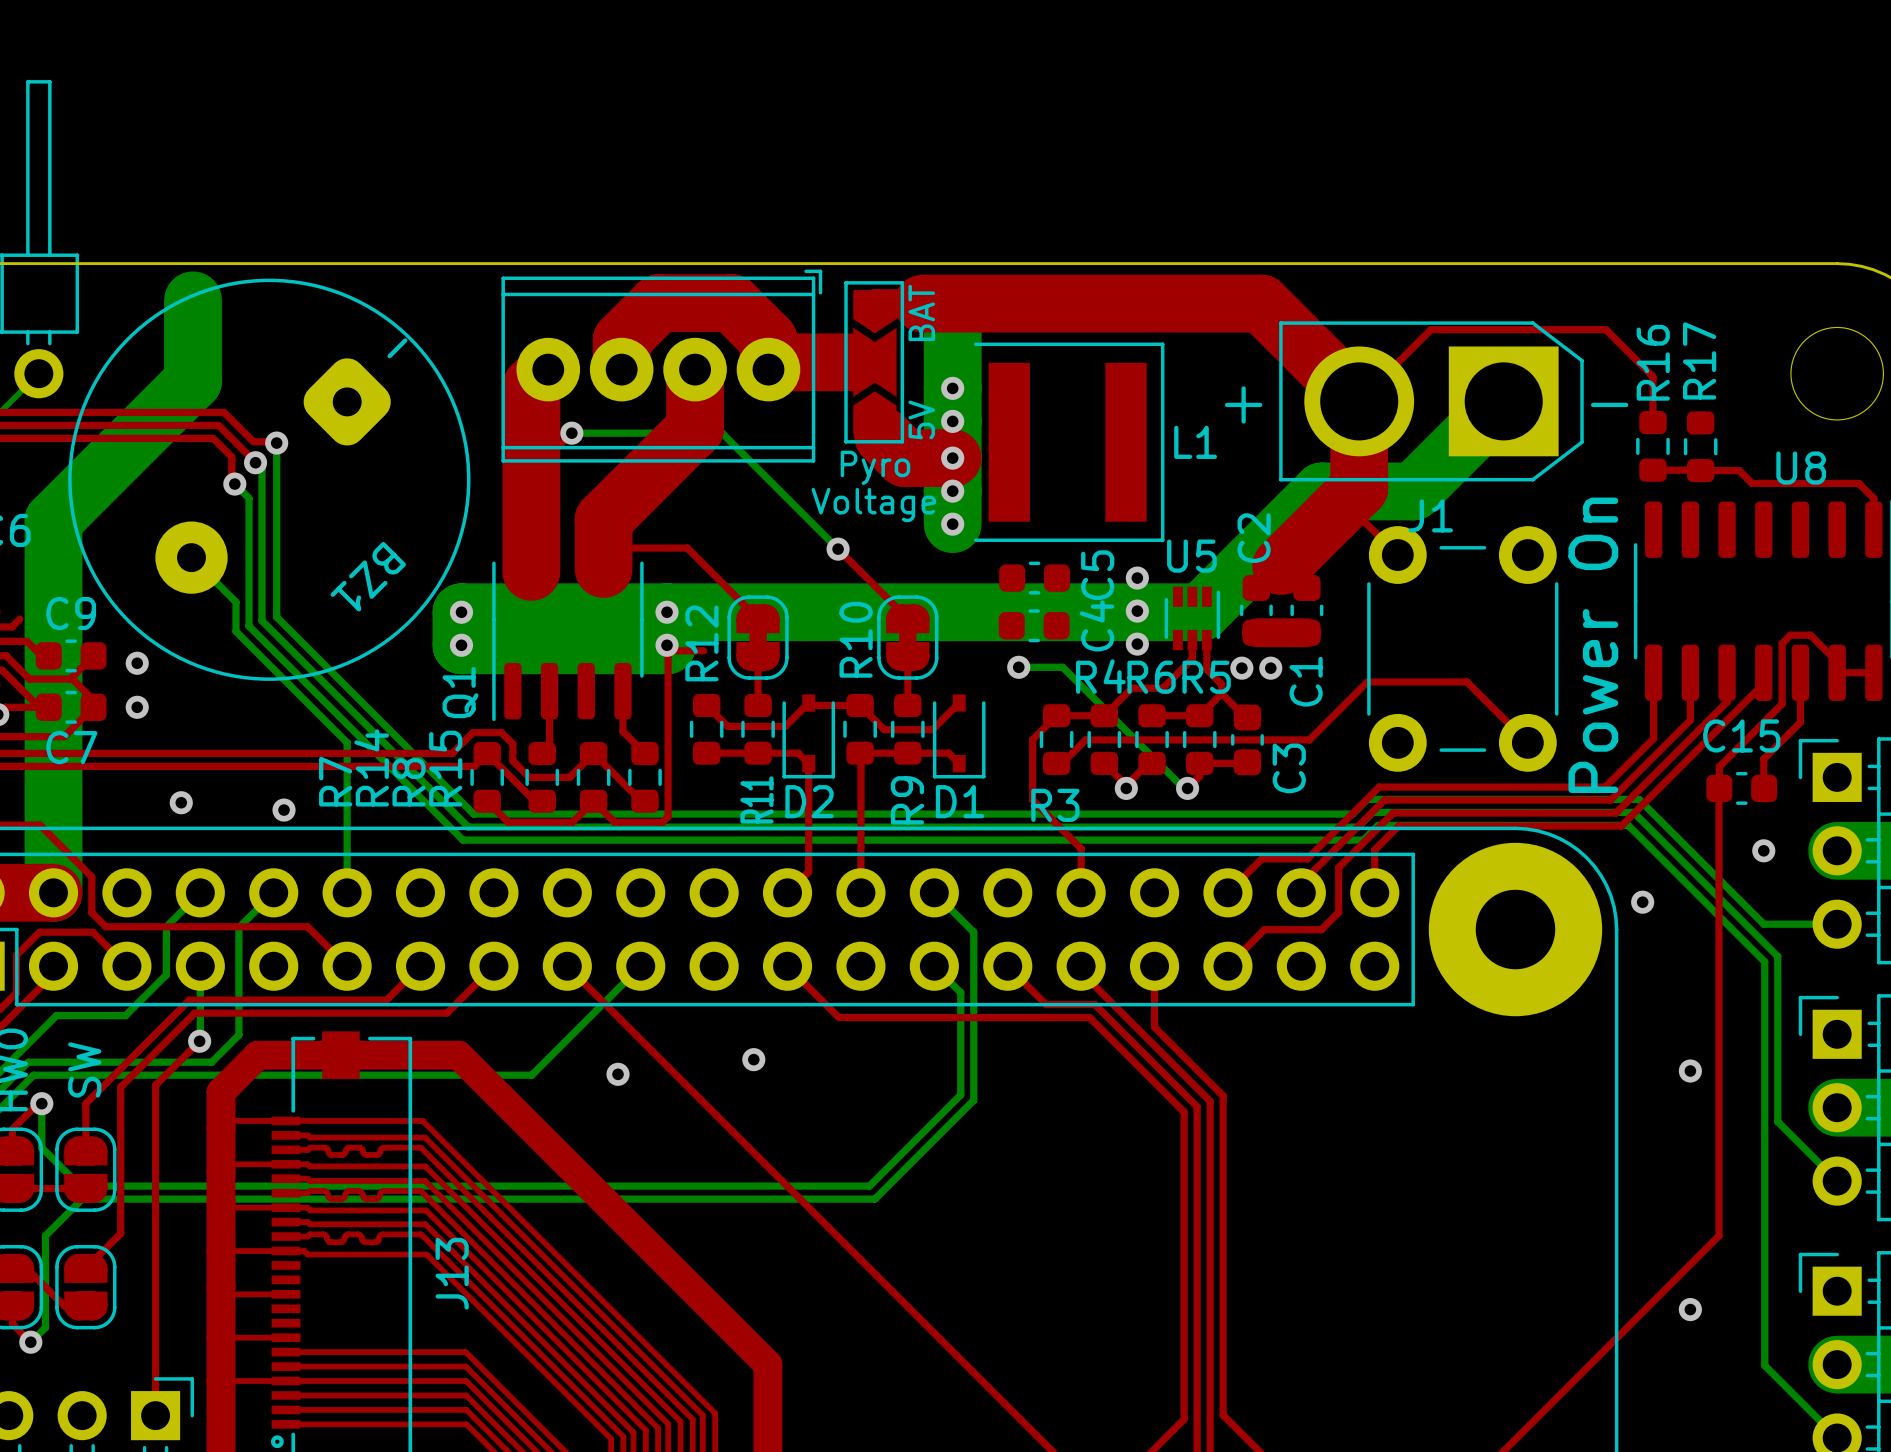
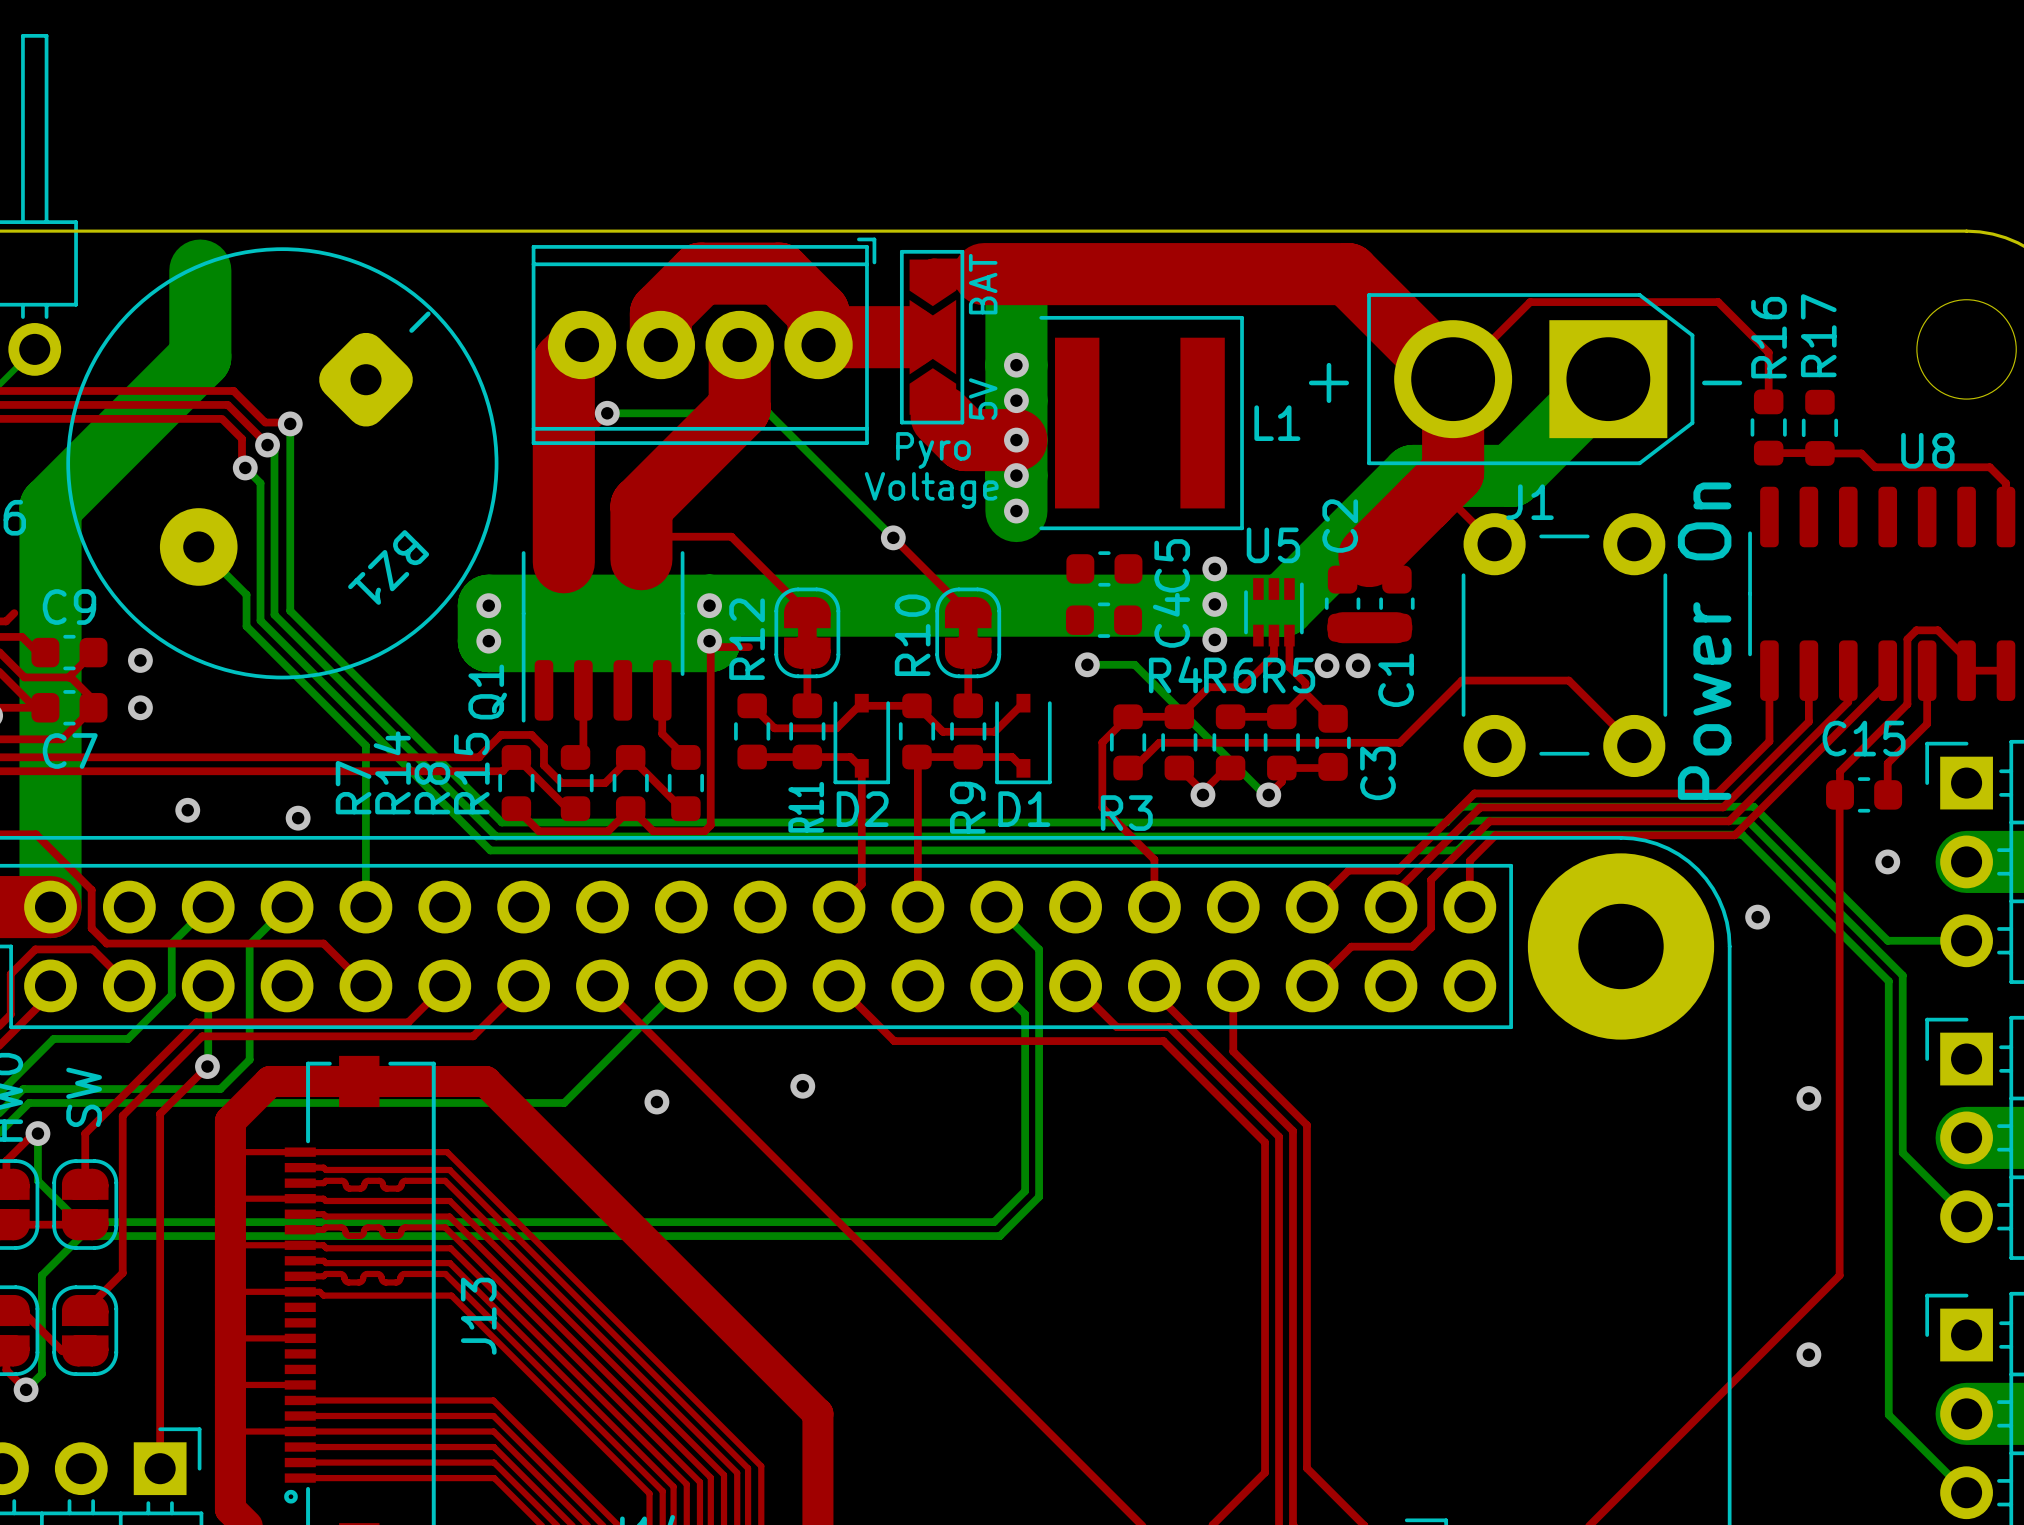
bottom track: (960, 1094) (869, 1186) -> (1025, 1124) (1025, 1191) (994, 1222) (927, 1222)
bottom track: (973, 1100) (874, 1199) -> (1039, 1129) (1039, 1196) (999, 1236) (932, 1236)

